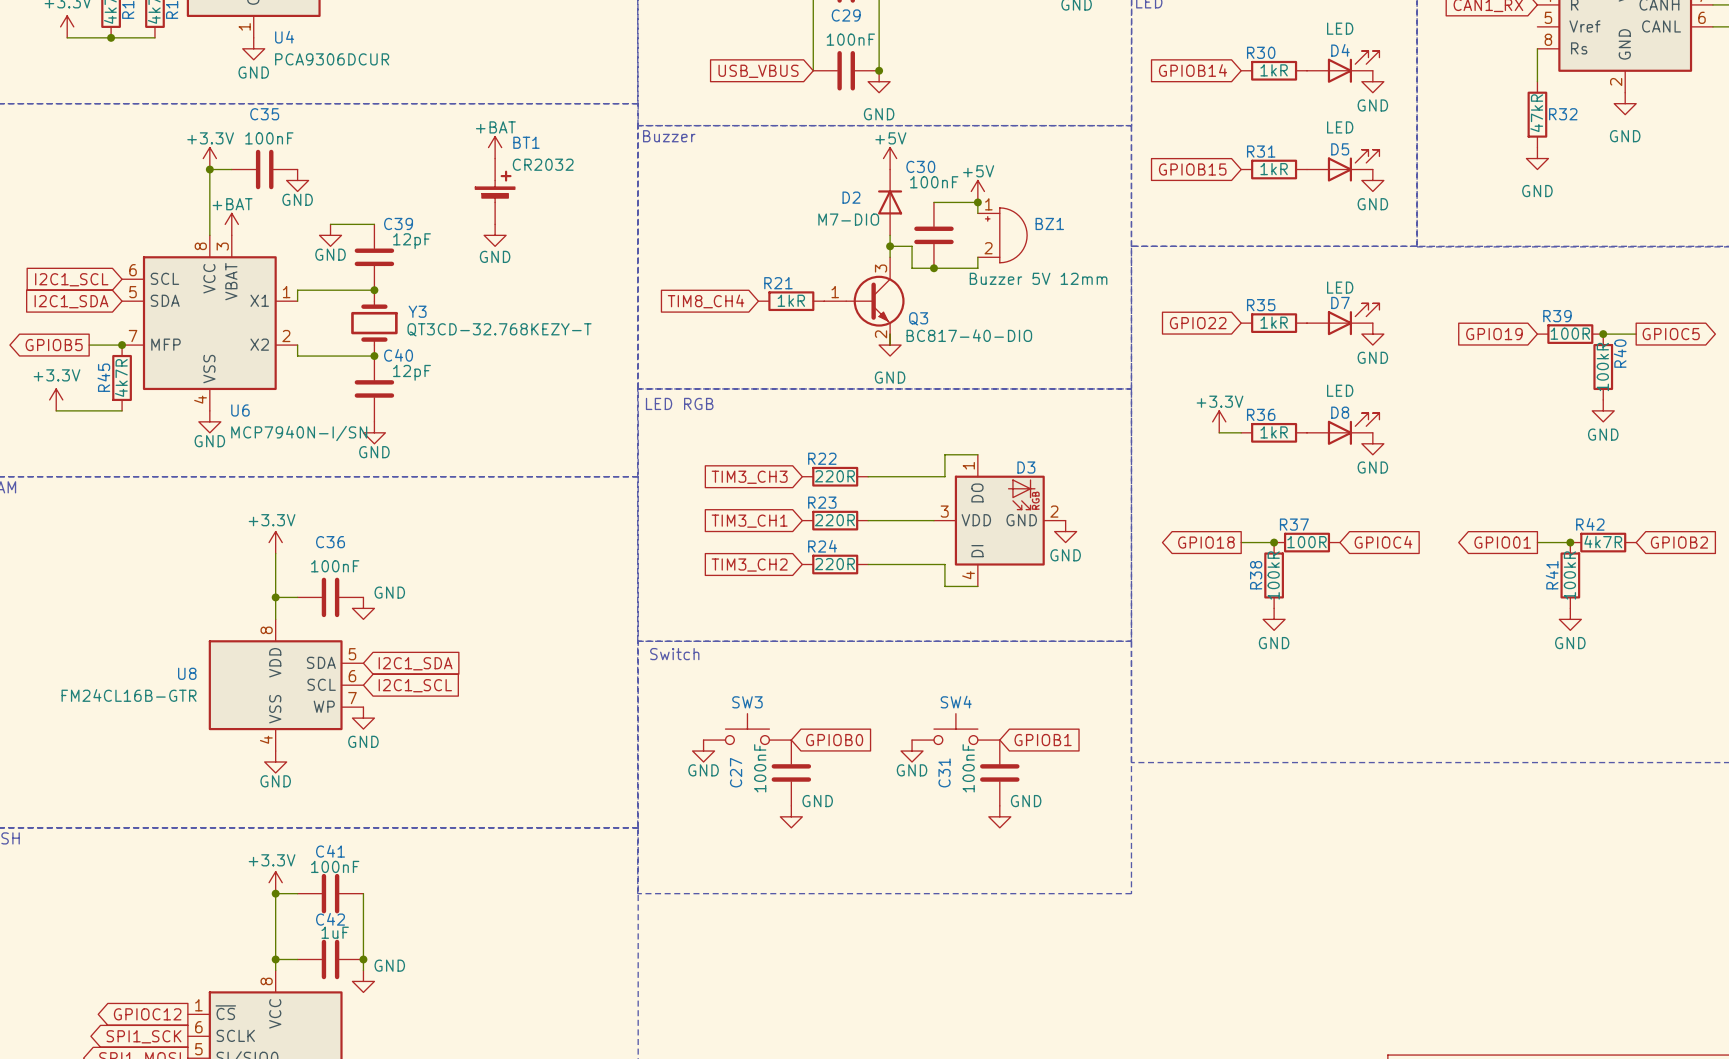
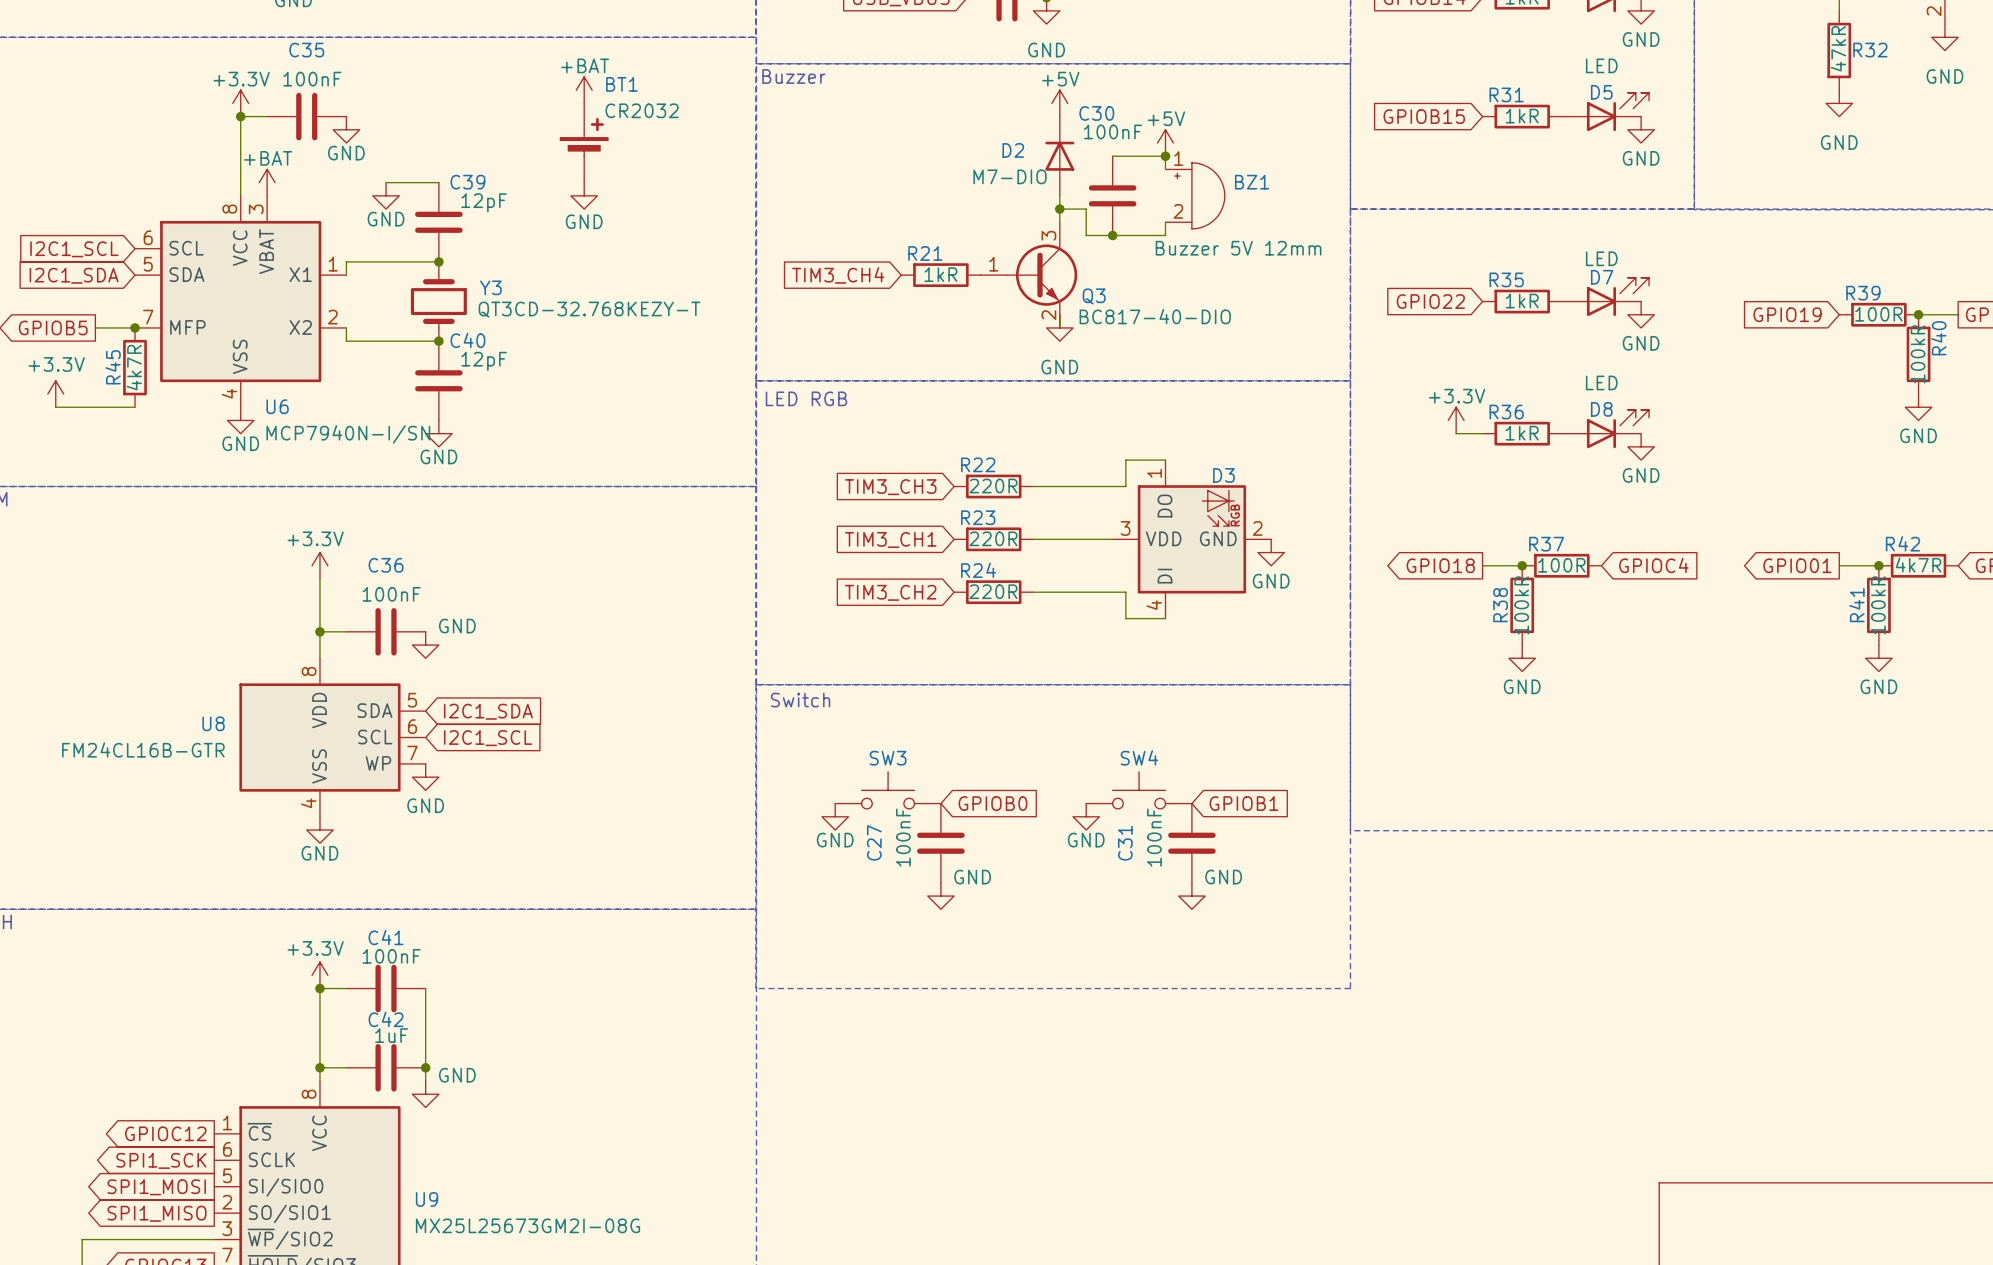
global label: TIM8_CH4 (706, 301) -> TIM3_CH4 (838, 275)

